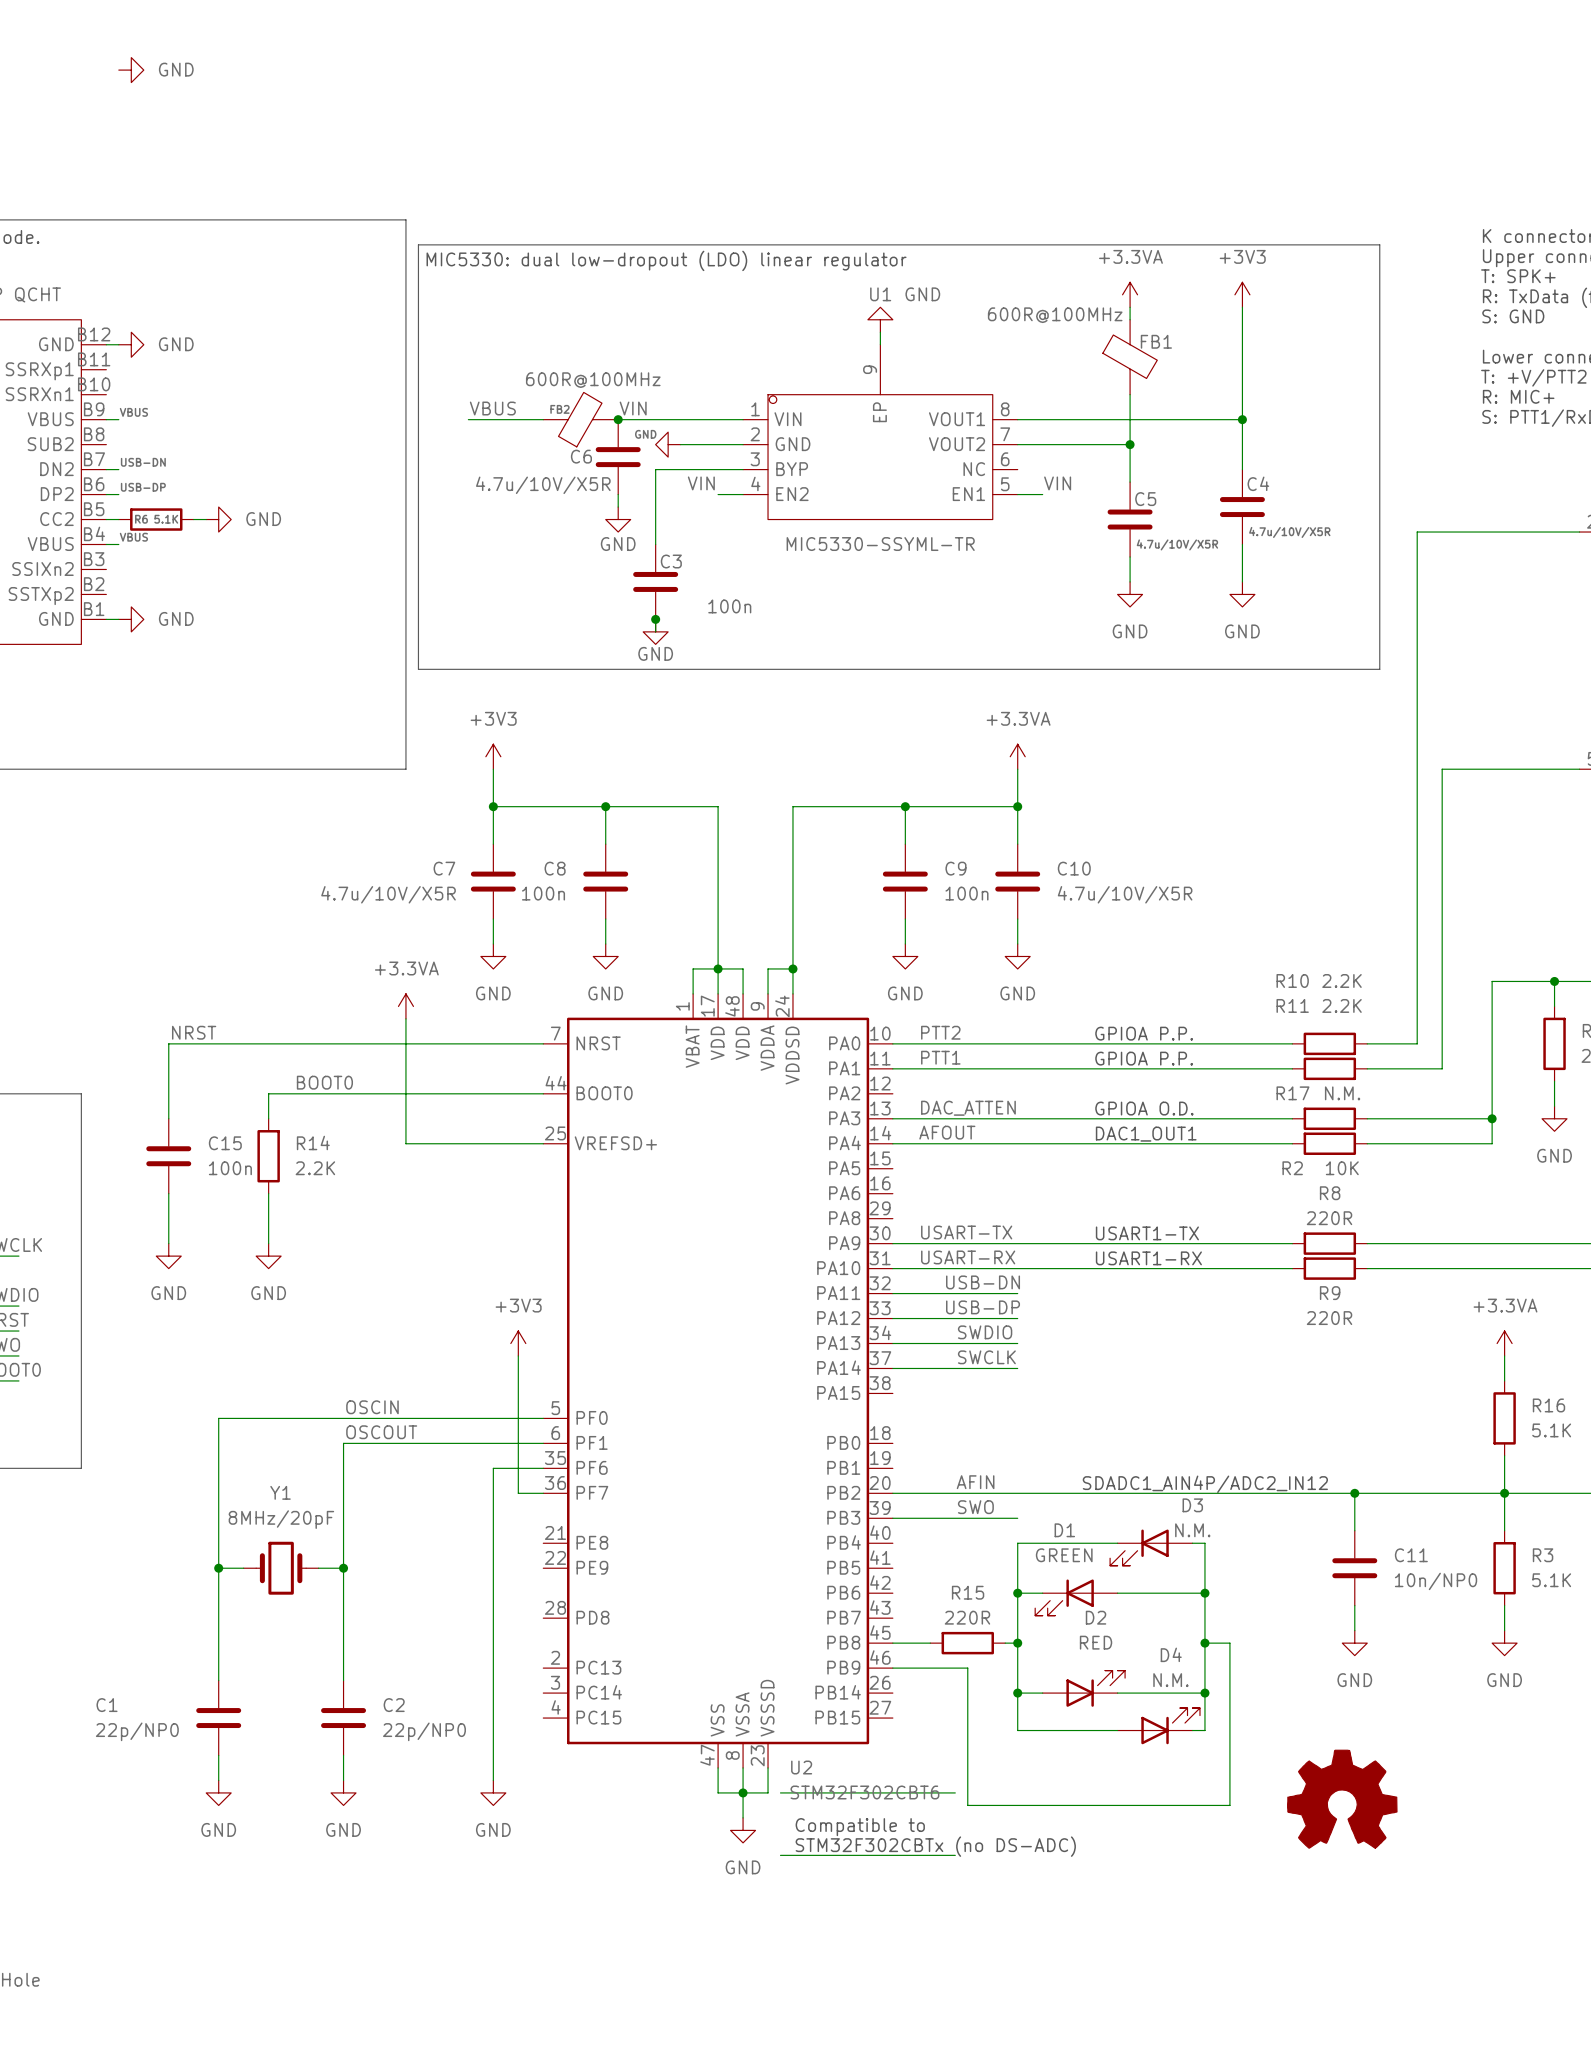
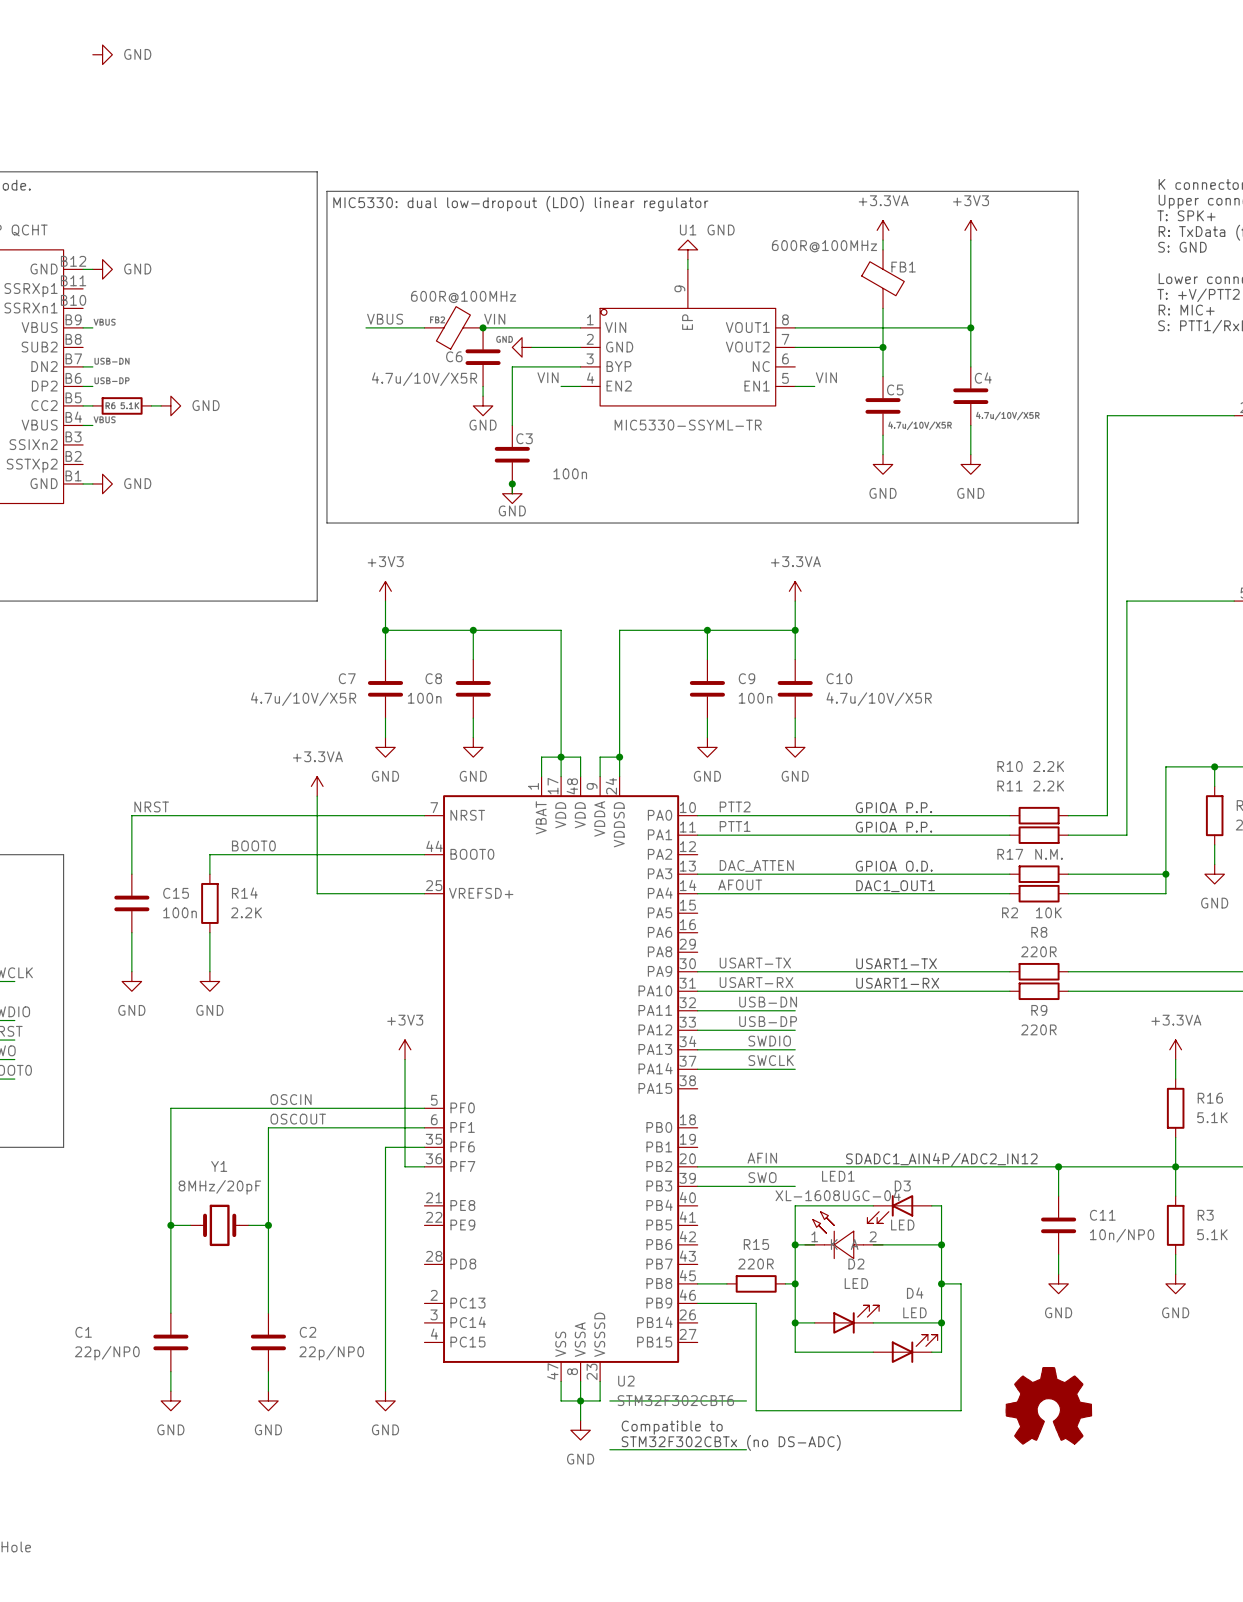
D3 name position: D3 (1192, 1505) -> D3 (902, 1185)
D3 value: N.M. (1192, 1530) -> LED (902, 1225)
LED1: none -> XL-1608UGC-04 (843, 1235)
D1: GREEN (1076, 1597) -> none
D2 value: RED (1096, 1642) -> LED (856, 1283)
D4 value: N.M. (1170, 1680) -> LED (914, 1312)

